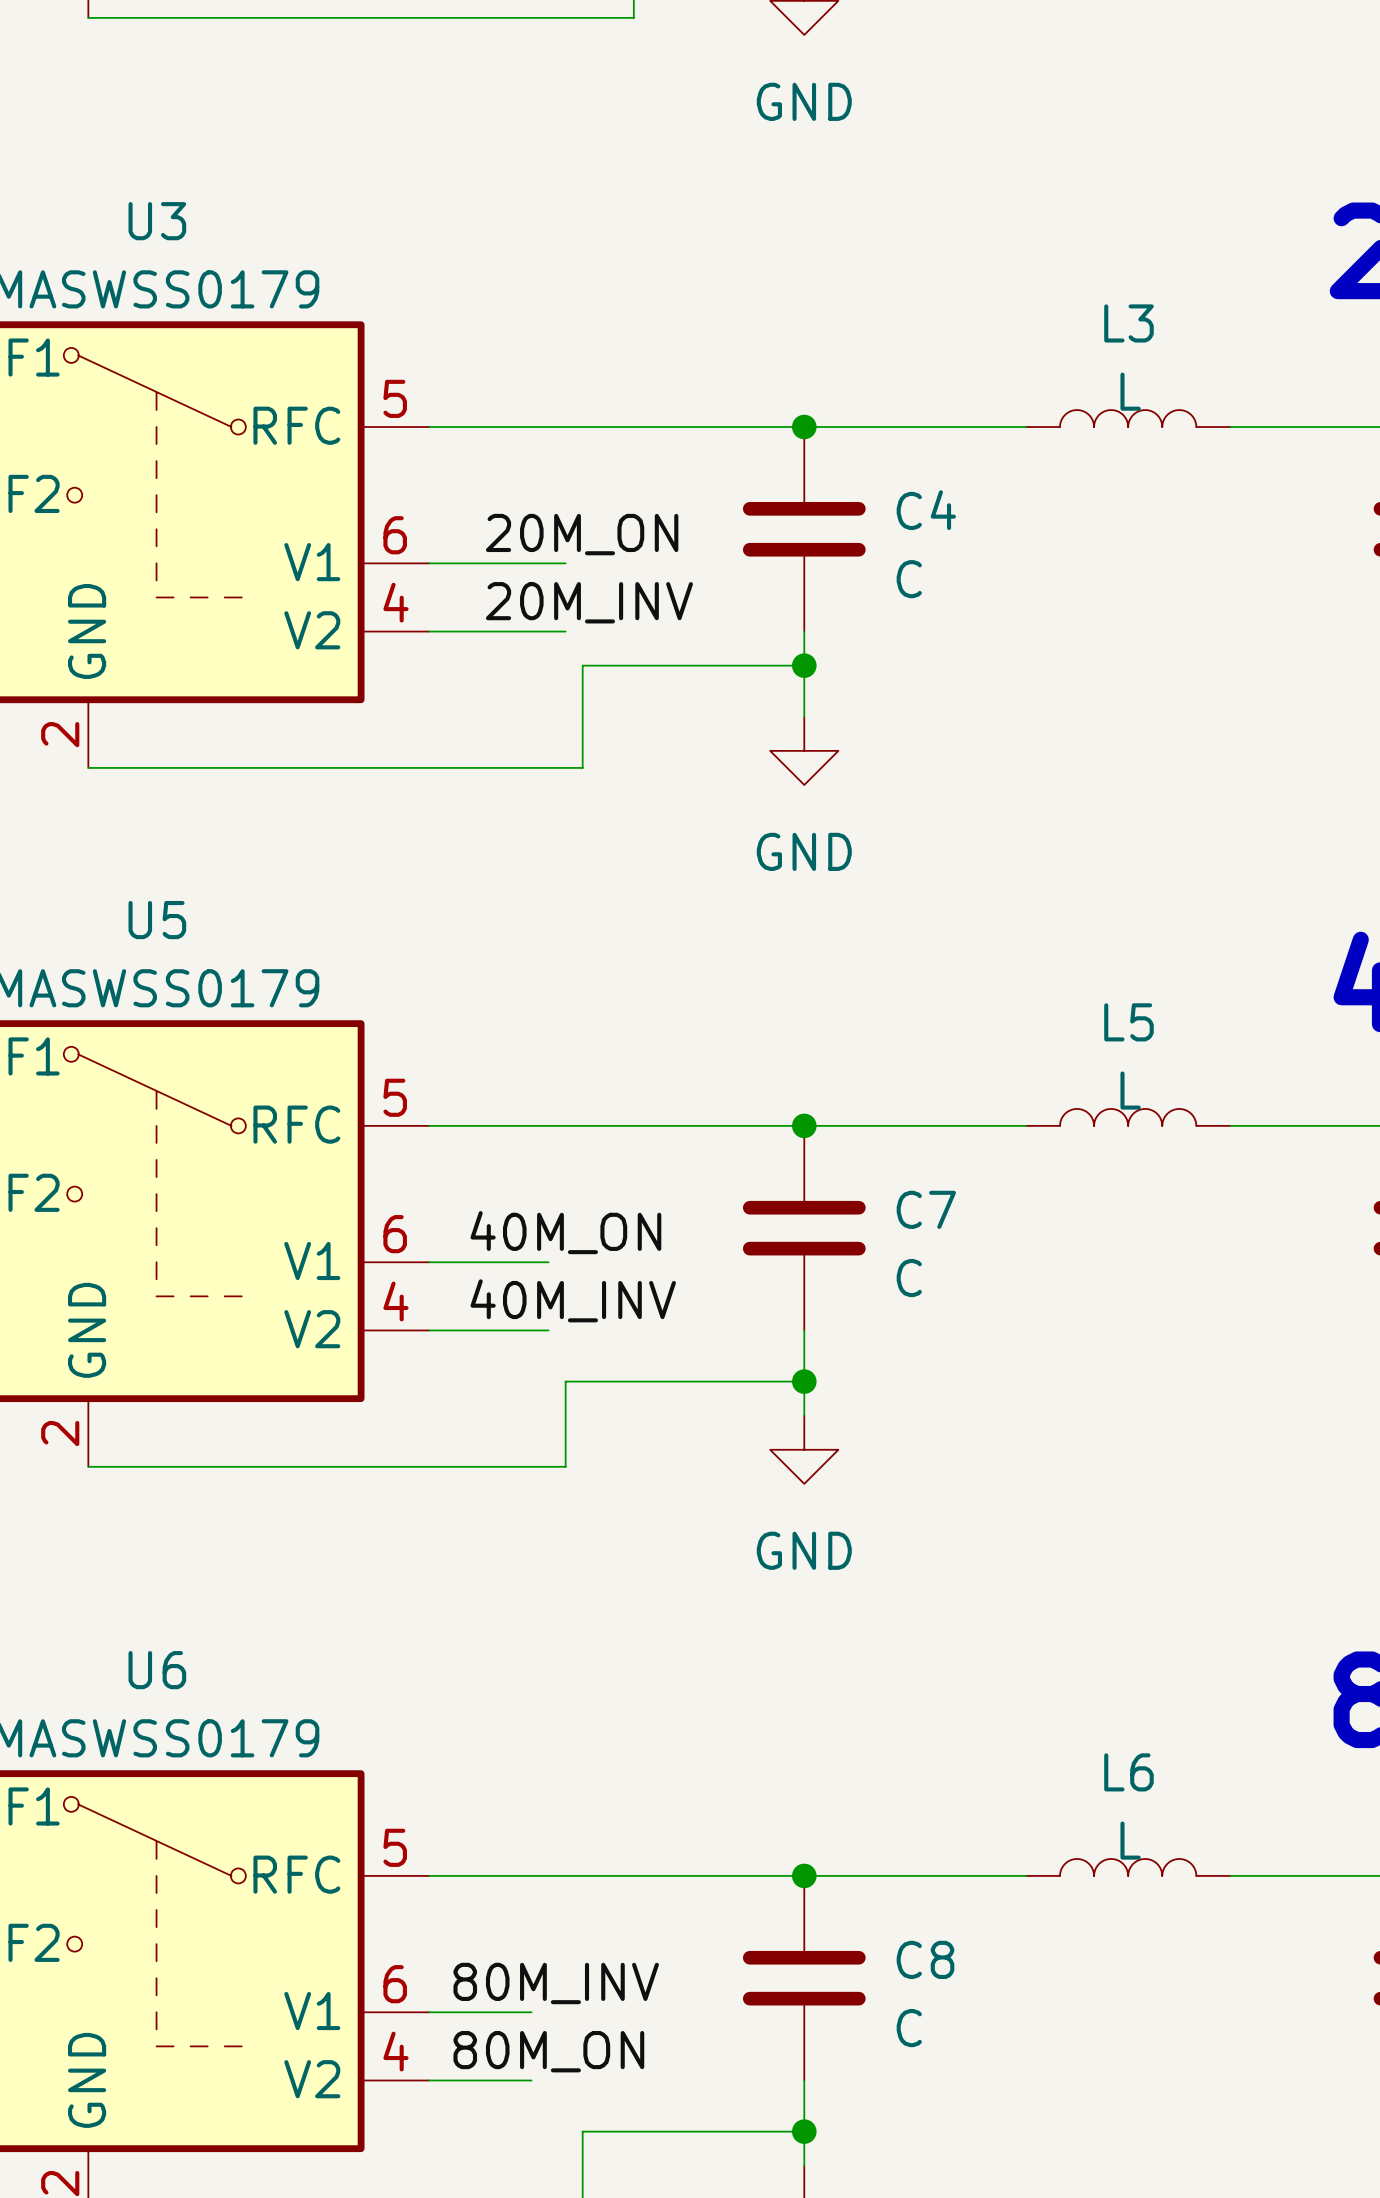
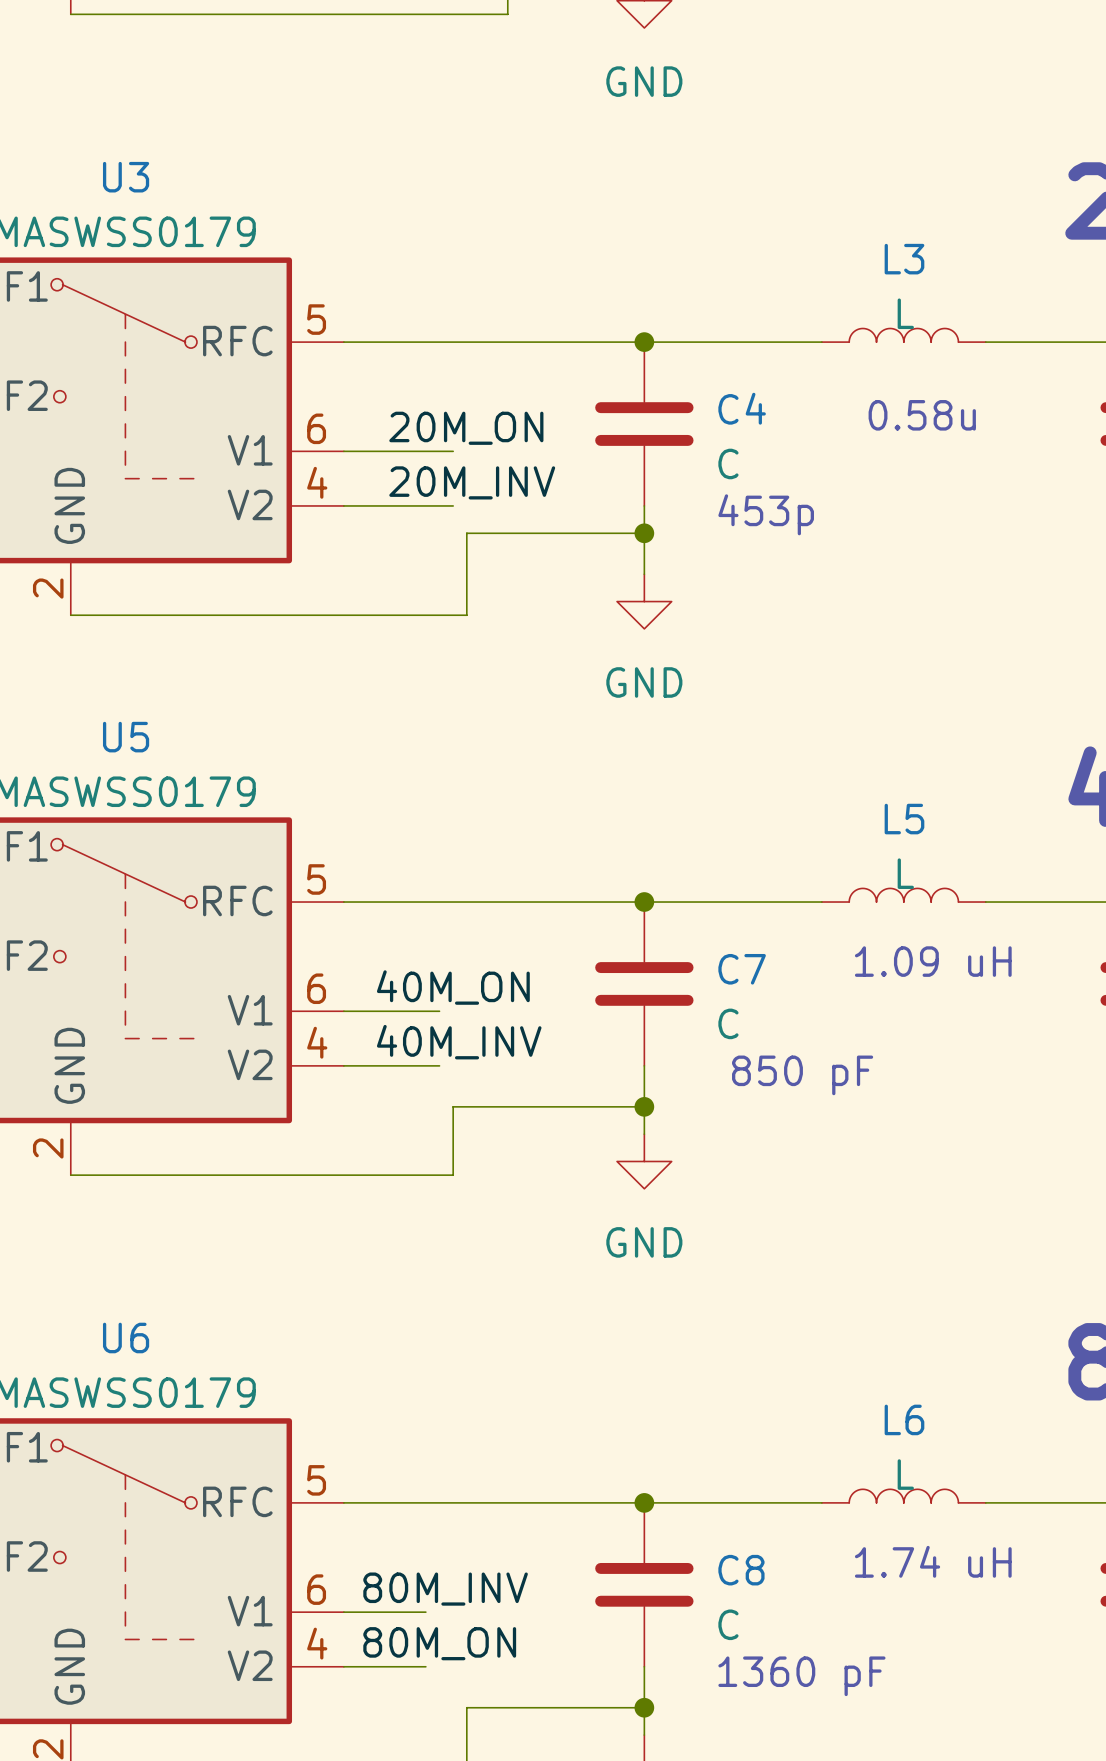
text: none -> 0.58u (922, 415)
text: none -> 453p (766, 514)
text: none -> 1.09 uH (933, 961)
text: none -> 850 pF (802, 1075)
text: none -> 1.74 uH (933, 1561)
text: none -> 1360 pF (801, 1676)

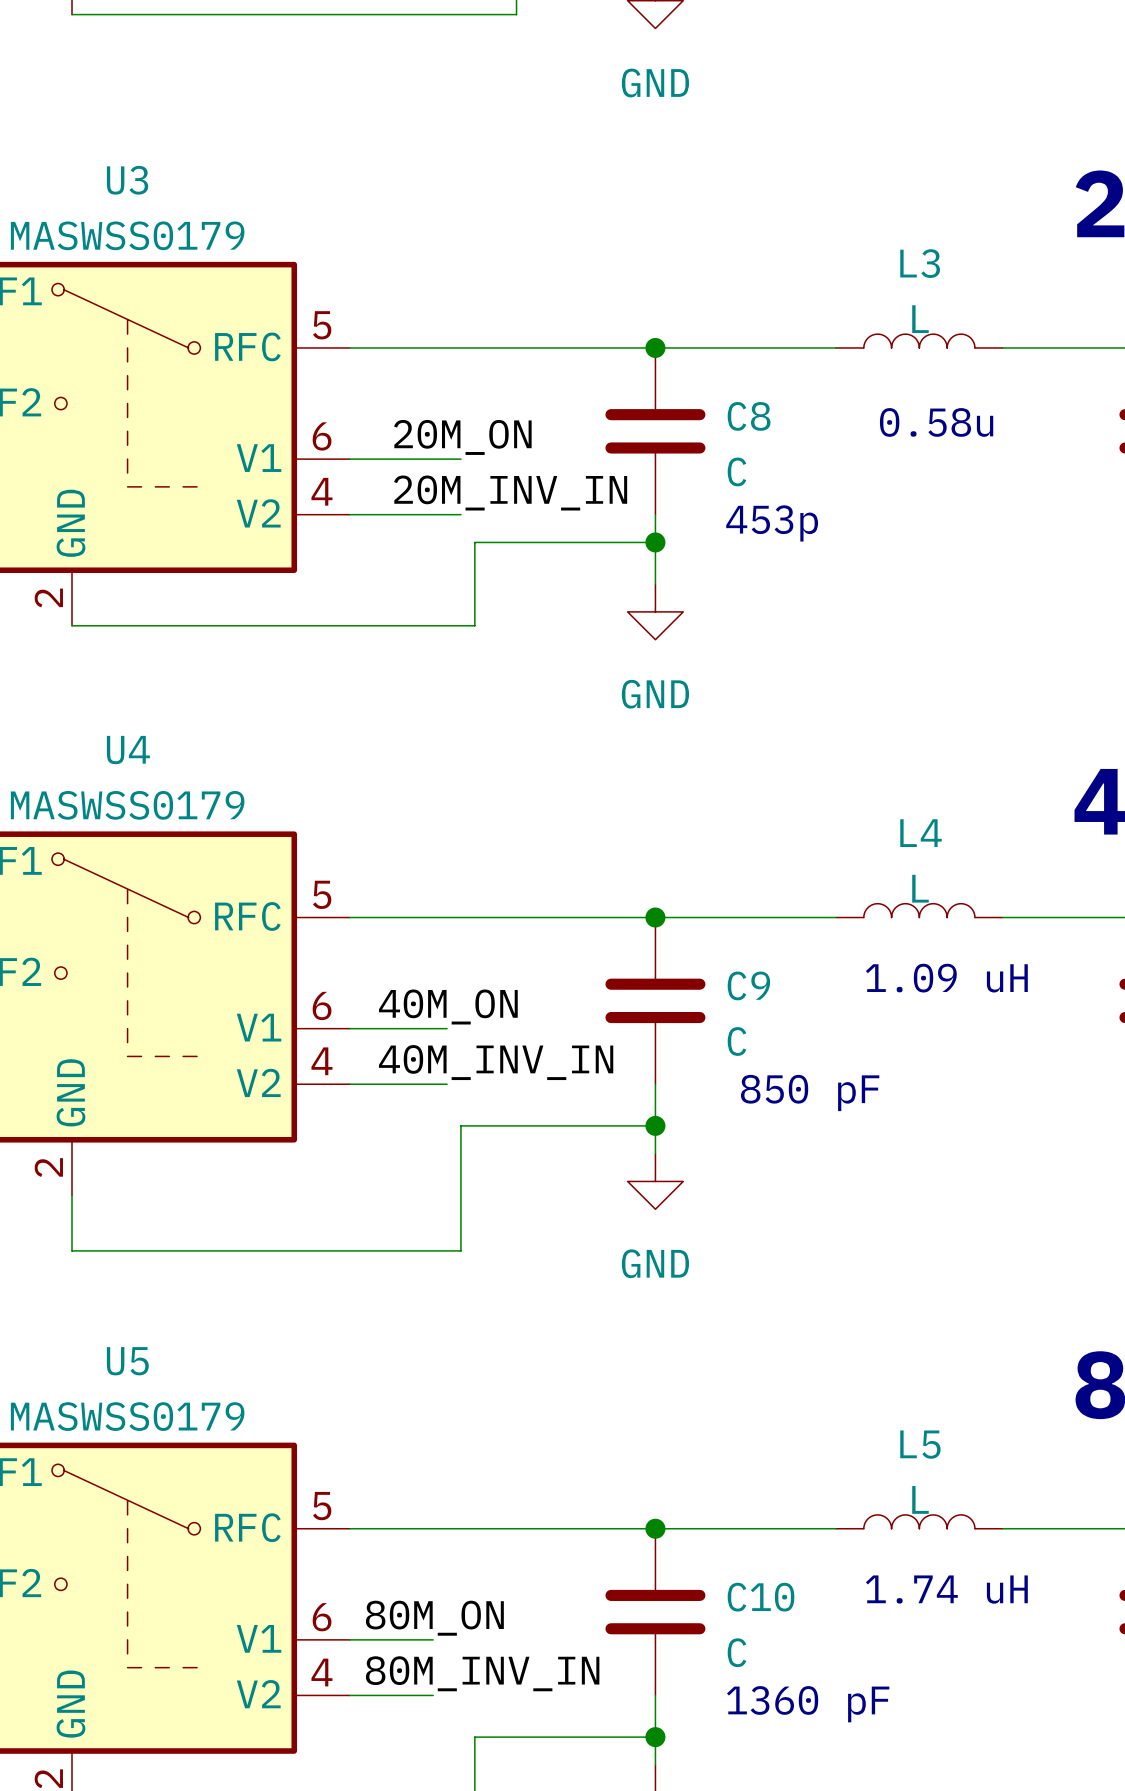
C4 name: C4 (742, 408) -> C8 (749, 416)
label: 20M_INV (472, 482) -> 20M_INV_IN (510, 493)
U5 name: U5 (126, 737) -> U4 (128, 750)
L5 name: L5 (904, 819) -> L4 (921, 833)
C7 name: C7 (742, 969) -> C9 (748, 985)
label: 40M_INV (459, 1042) -> 40M_INV_IN (496, 1062)
wire: (70, 1175) (453, 1175) -> (72, 1195) (72, 1250) (460, 1250) (460, 1195)
U6 name: U6 (126, 1338) -> U5 (127, 1361)
L6 name: L6 (904, 1419) -> L5 (920, 1444)
C8 name: C8 (741, 1570) -> C10 (761, 1597)
label: 80M_INV (445, 1589) -> 80M_ON (434, 1618)
label: 80M_ON (439, 1643) -> 80M_INV_IN (482, 1673)

